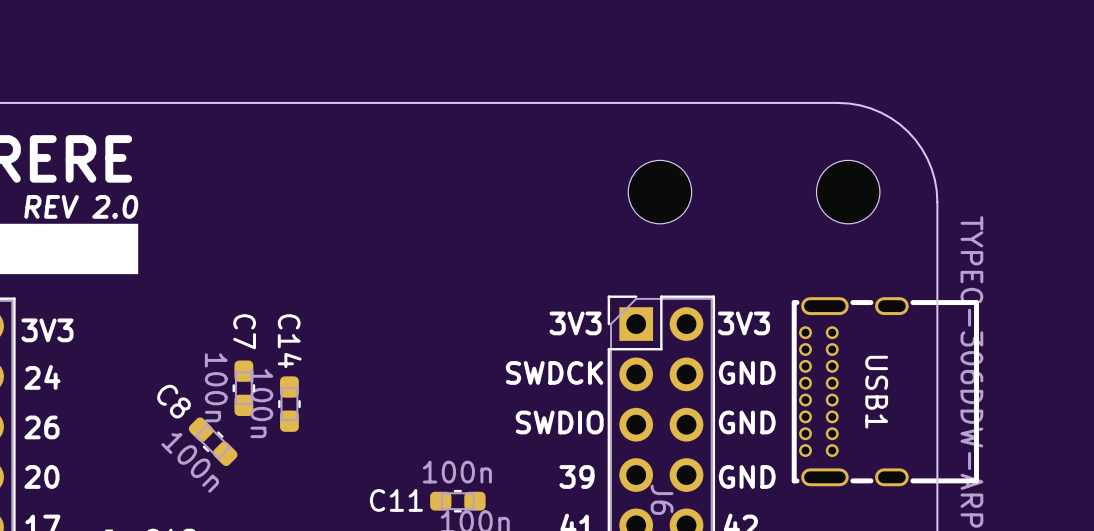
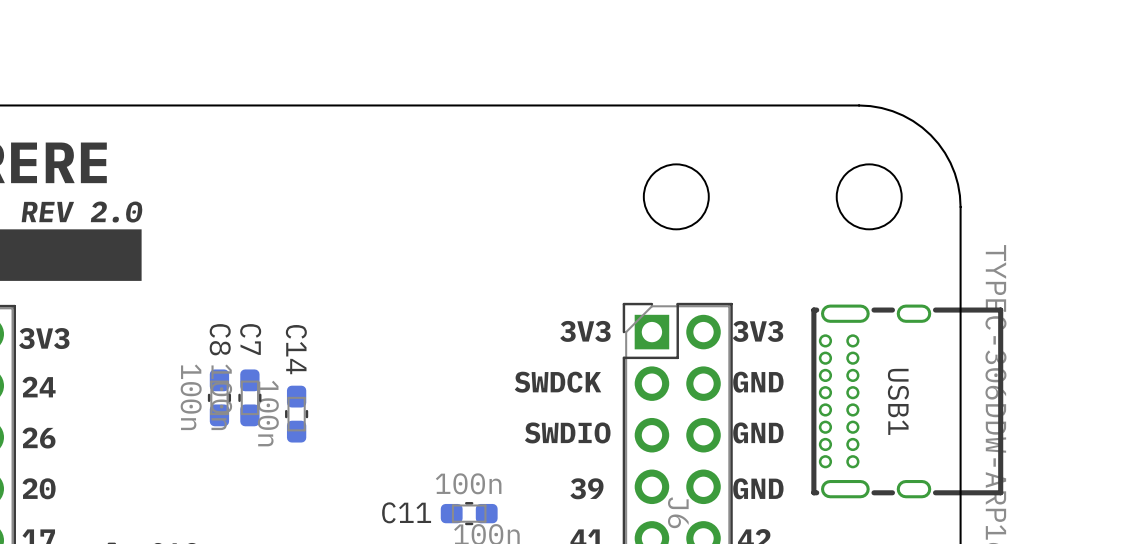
C8 rotation: 0° (213, 441) -> 45° clockwise (219, 397)
C8 position: (213, 441) -> (219, 397)

